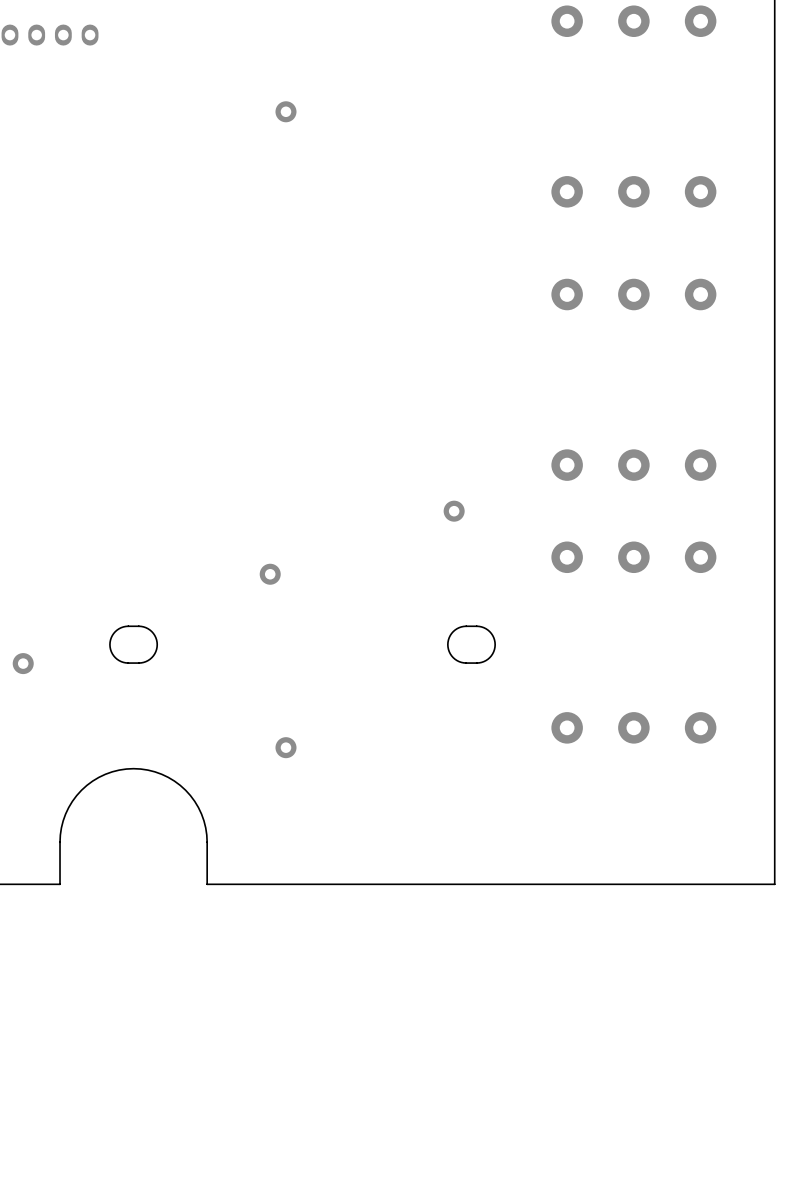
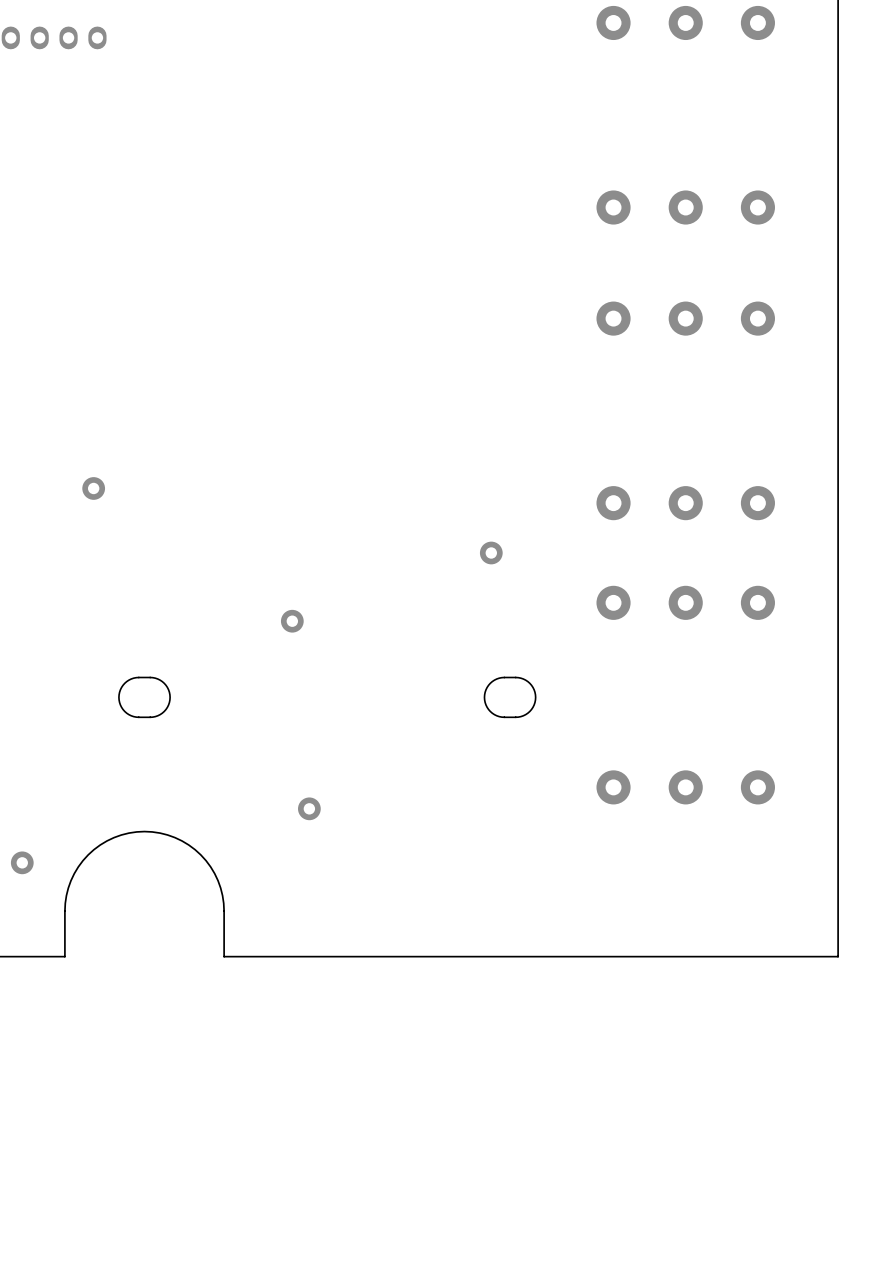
part: (285, 111) -> none
part: none -> (93, 488)
part: (23, 663) -> none
part: none -> (22, 862)

